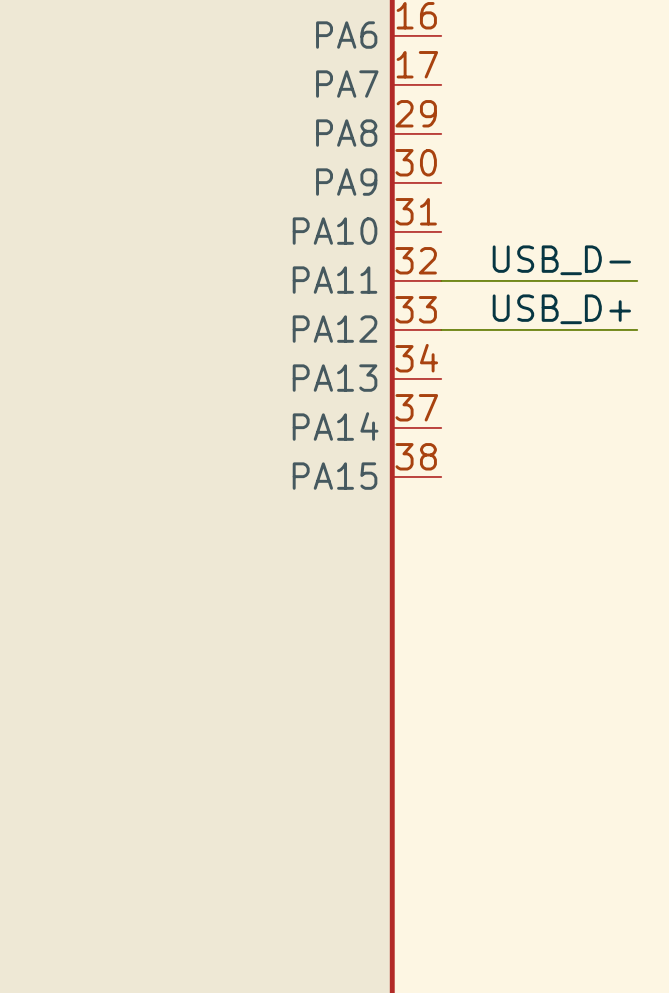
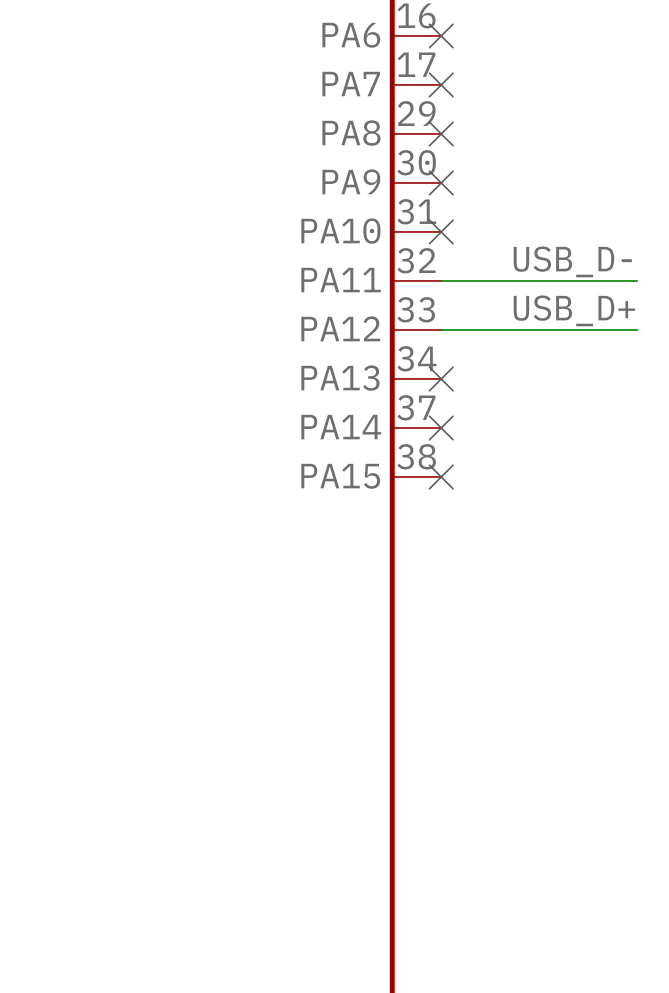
no-connect mark: none -> (441, 35)
no-connect mark: none -> (441, 84)
no-connect mark: none -> (441, 133)
no-connect mark: none -> (441, 182)
no-connect mark: none -> (441, 231)
no-connect mark: none -> (441, 378)
no-connect mark: none -> (441, 427)
no-connect mark: none -> (441, 476)

